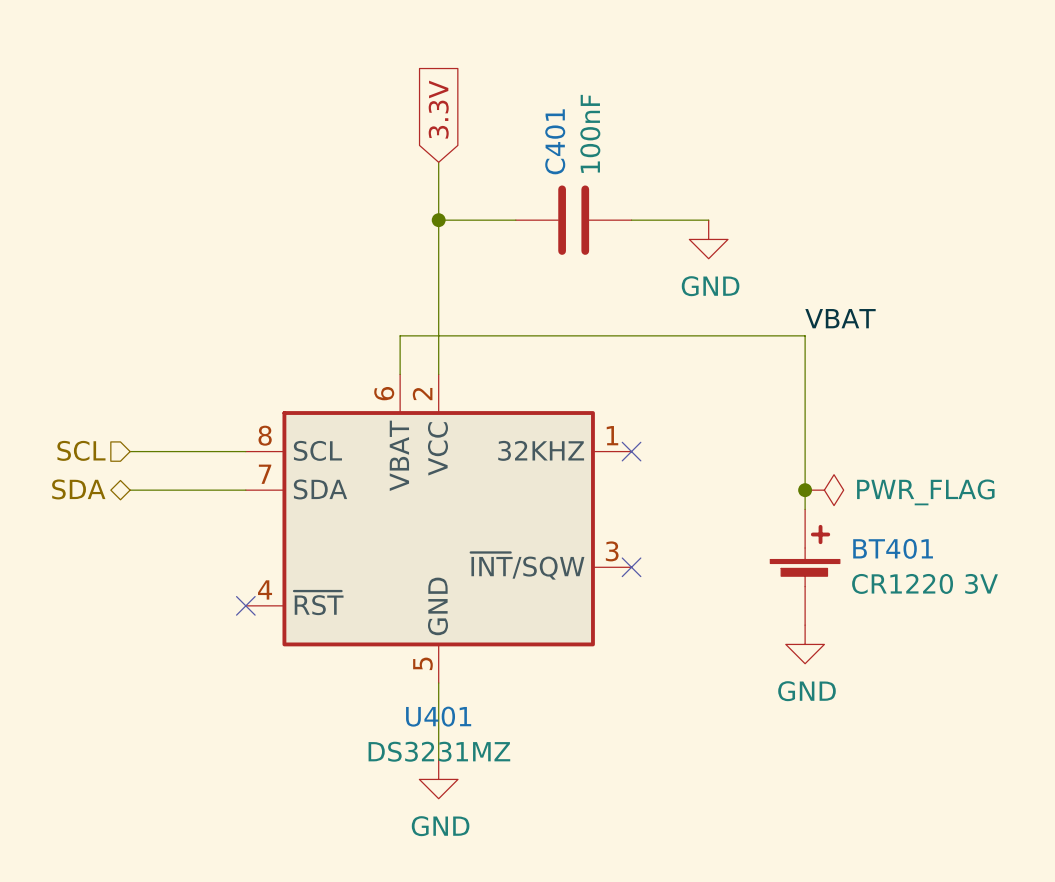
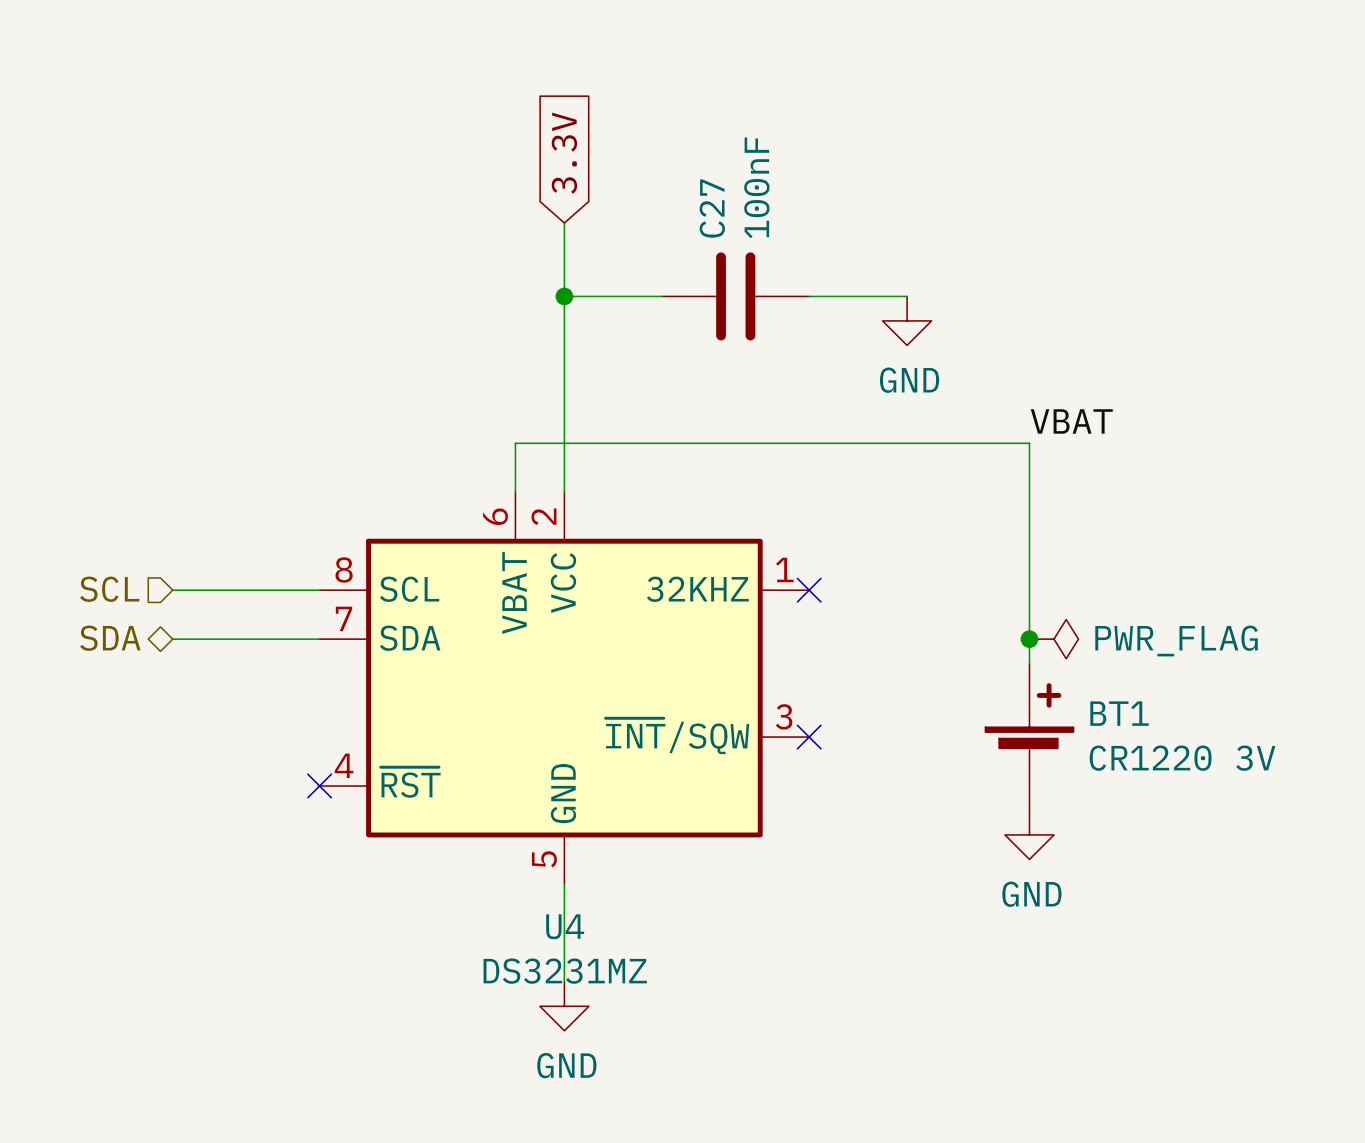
C401 name: C401 (555, 141) -> C27 (712, 208)
BT401 name: BT401 (893, 548) -> BT1 (1119, 713)
U401 name: U401 (438, 716) -> U4 (565, 926)

